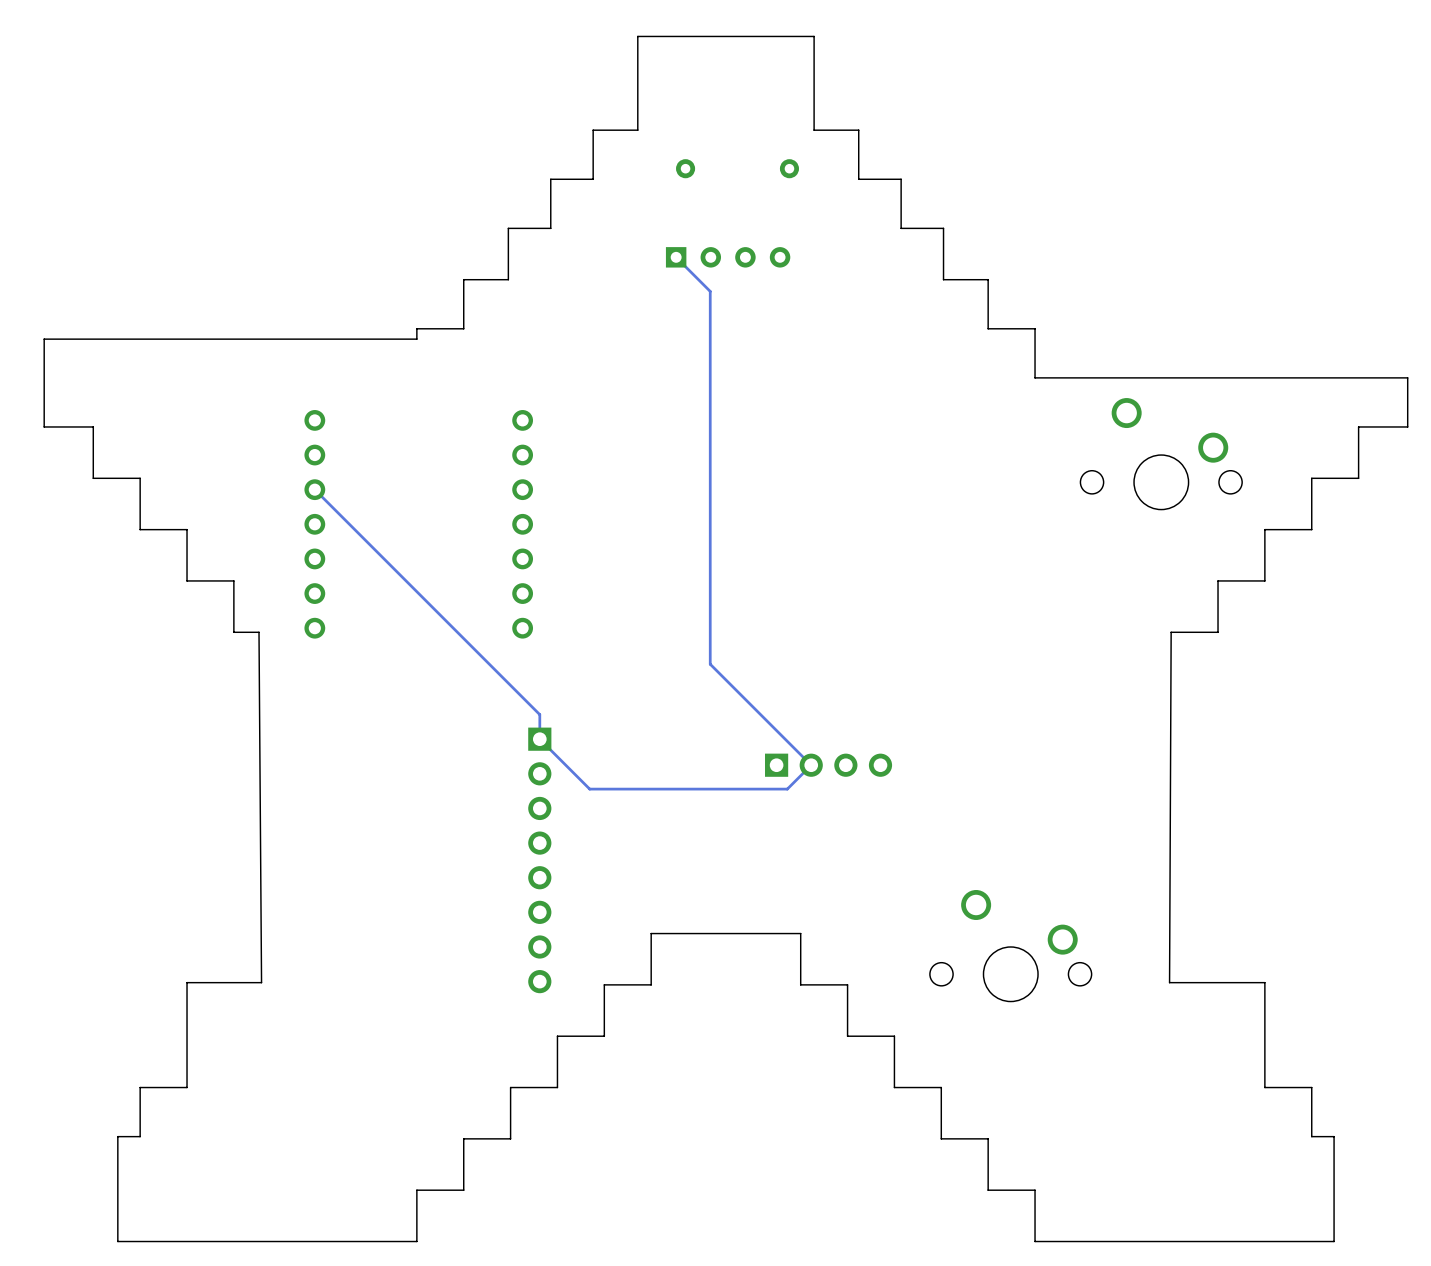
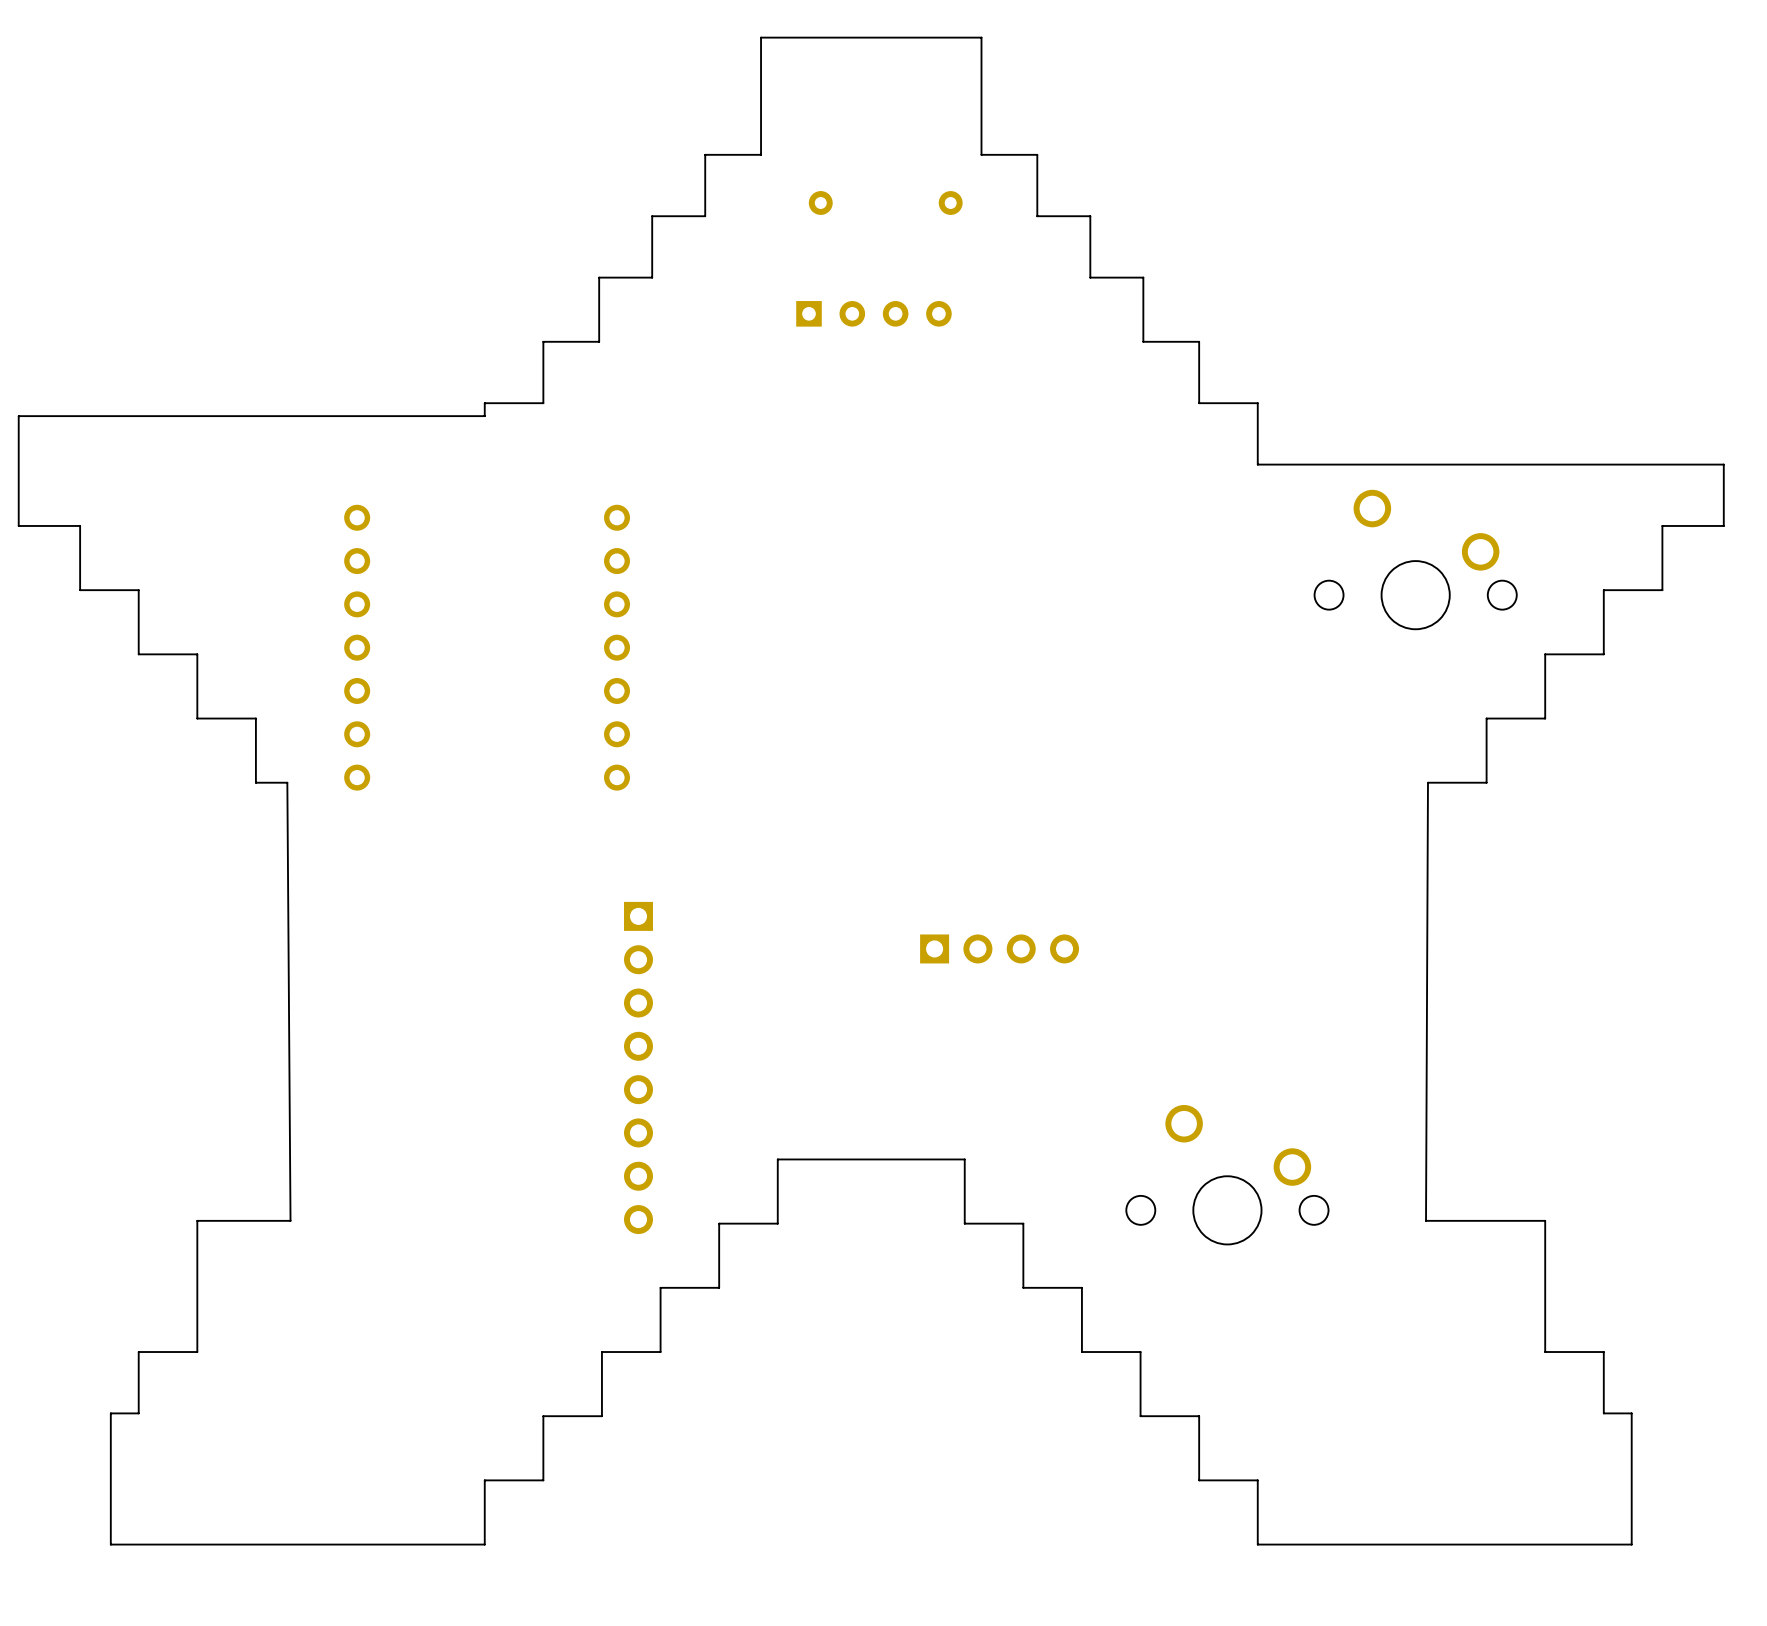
track: (676, 257) (710, 291) (710, 664) (811, 765) (787, 789) (589, 789) (539, 739) (539, 714) (314, 489) -> none

